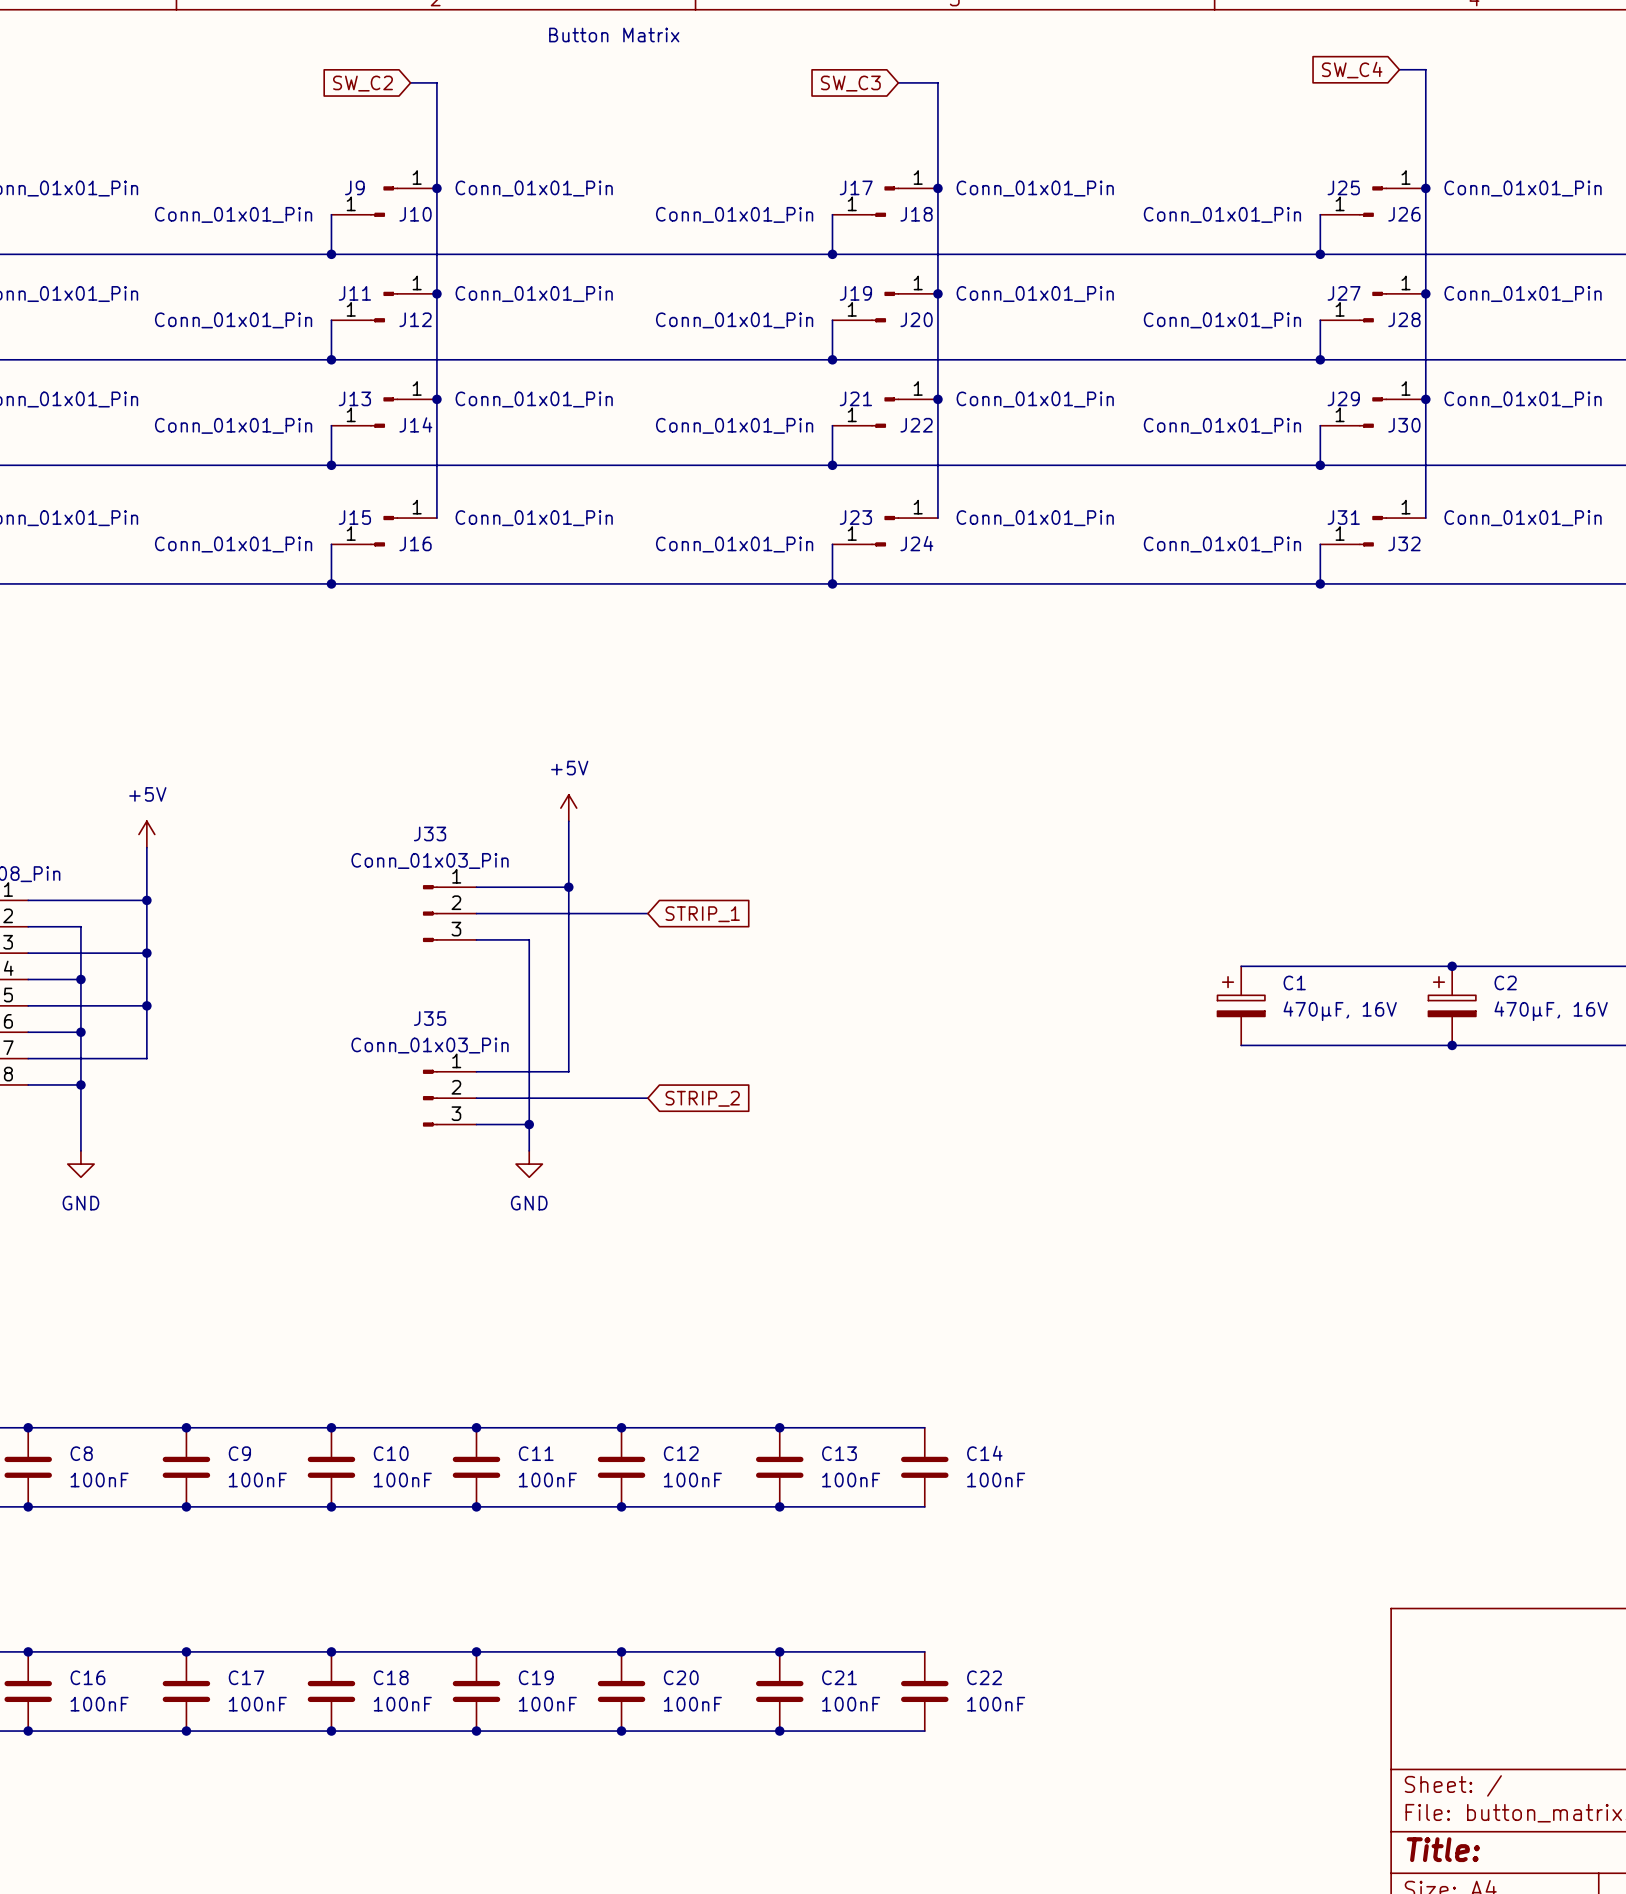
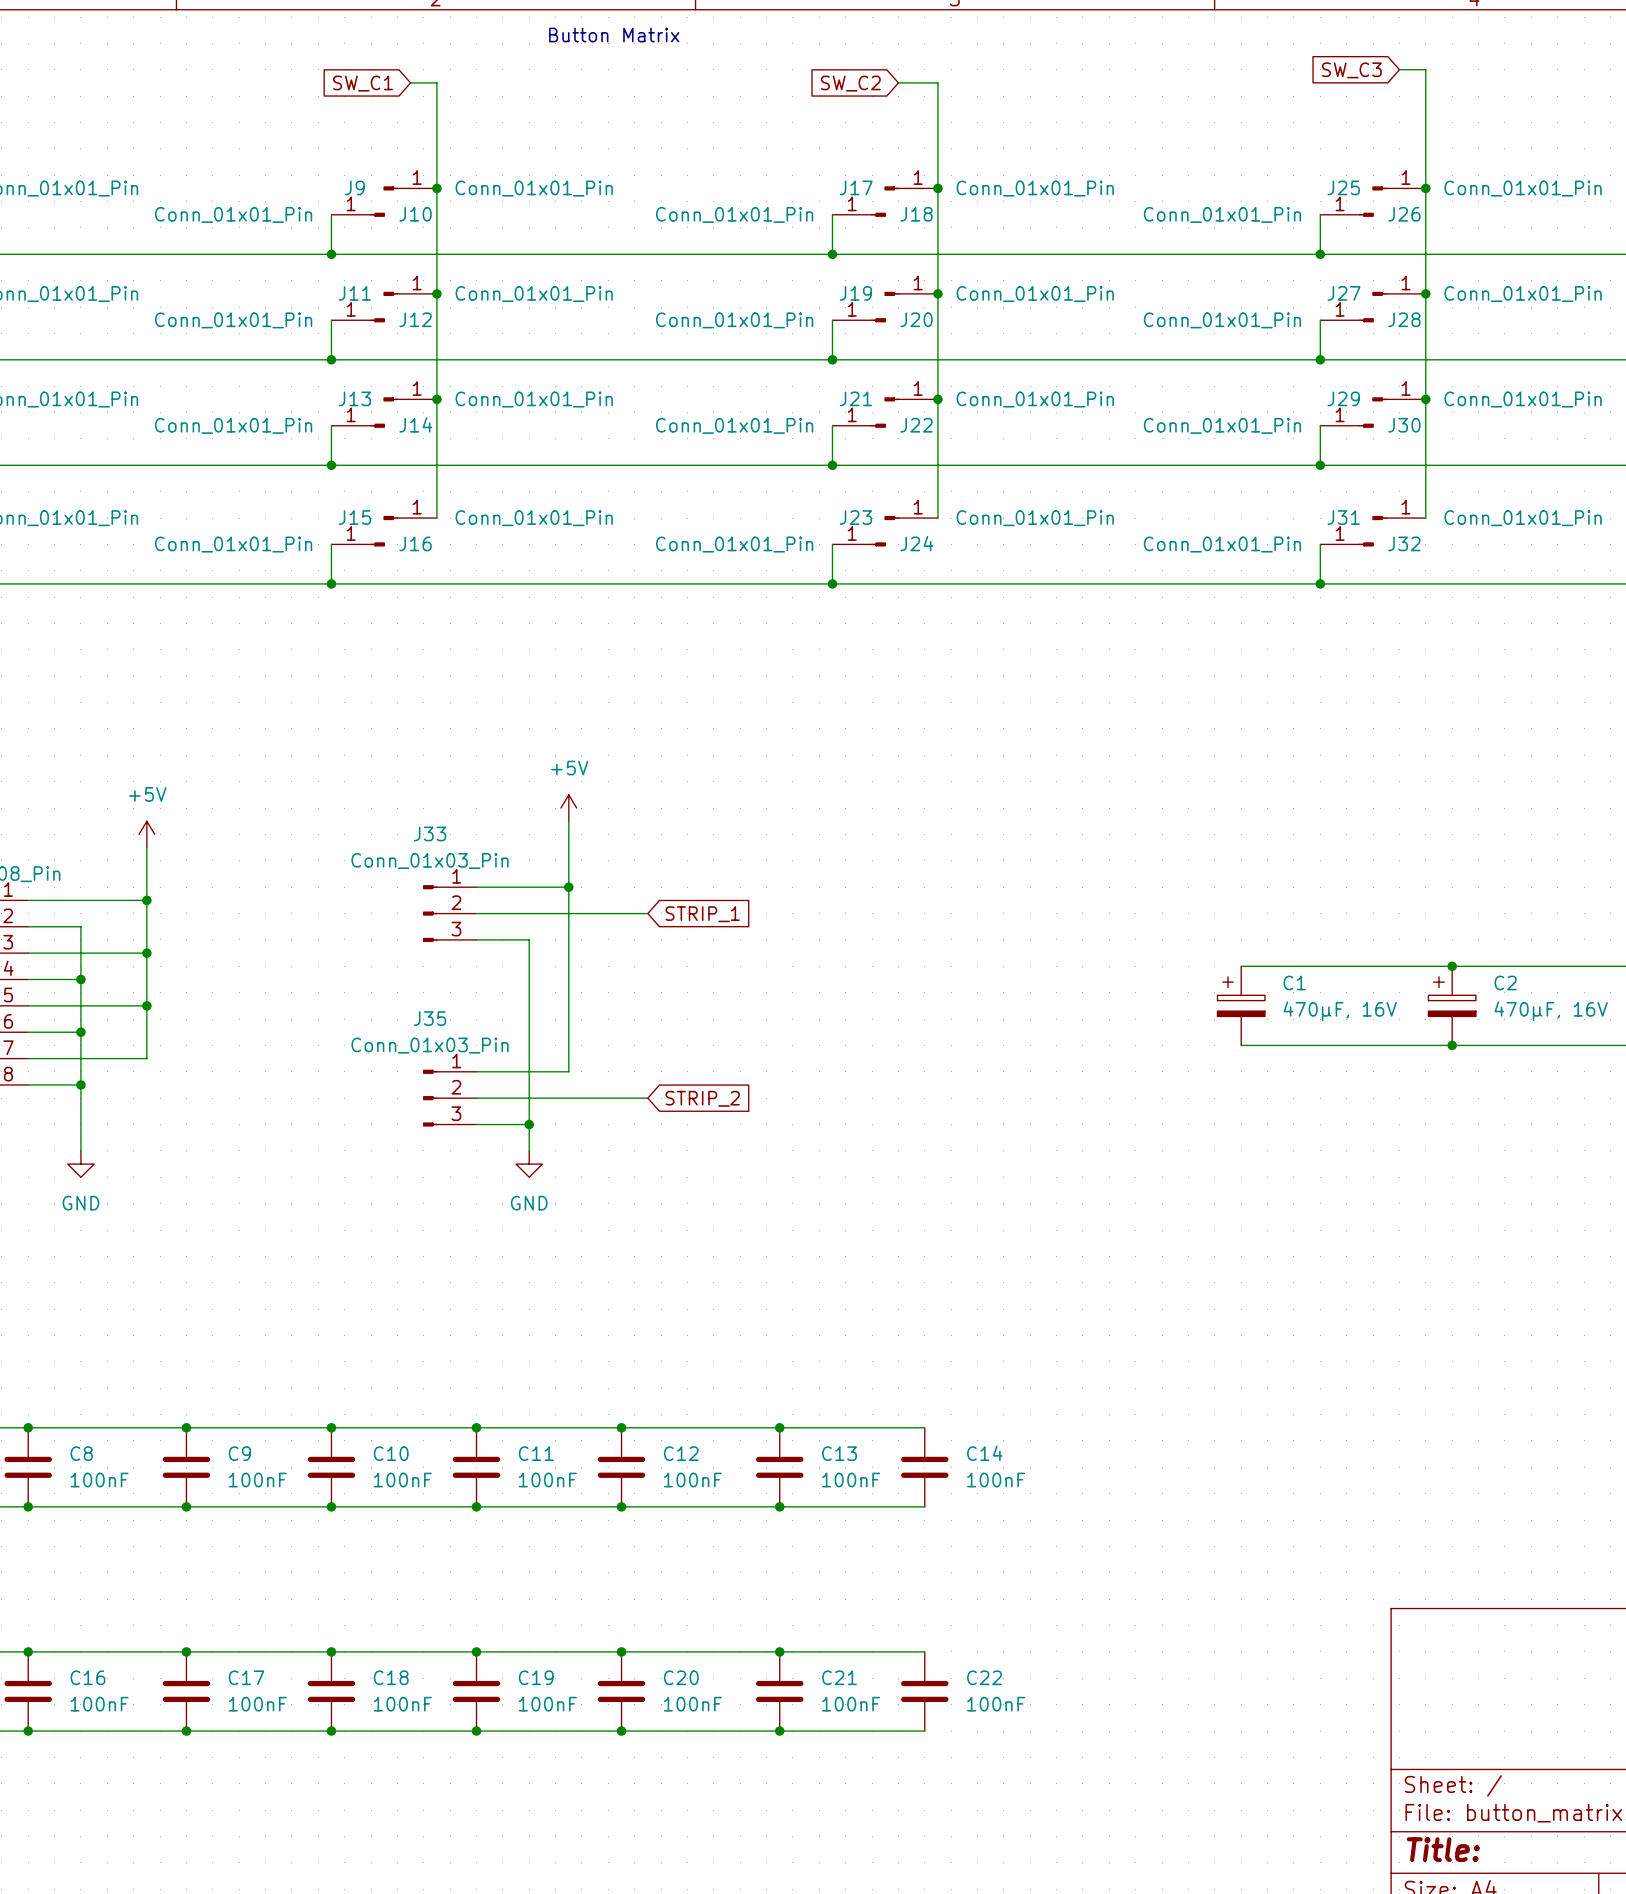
global label: SW_C4 (1352, 70) -> SW_C3 (1351, 70)
global label: SW_C2 (362, 83) -> SW_C1 (362, 83)
global label: SW_C3 (850, 83) -> SW_C2 (850, 83)

